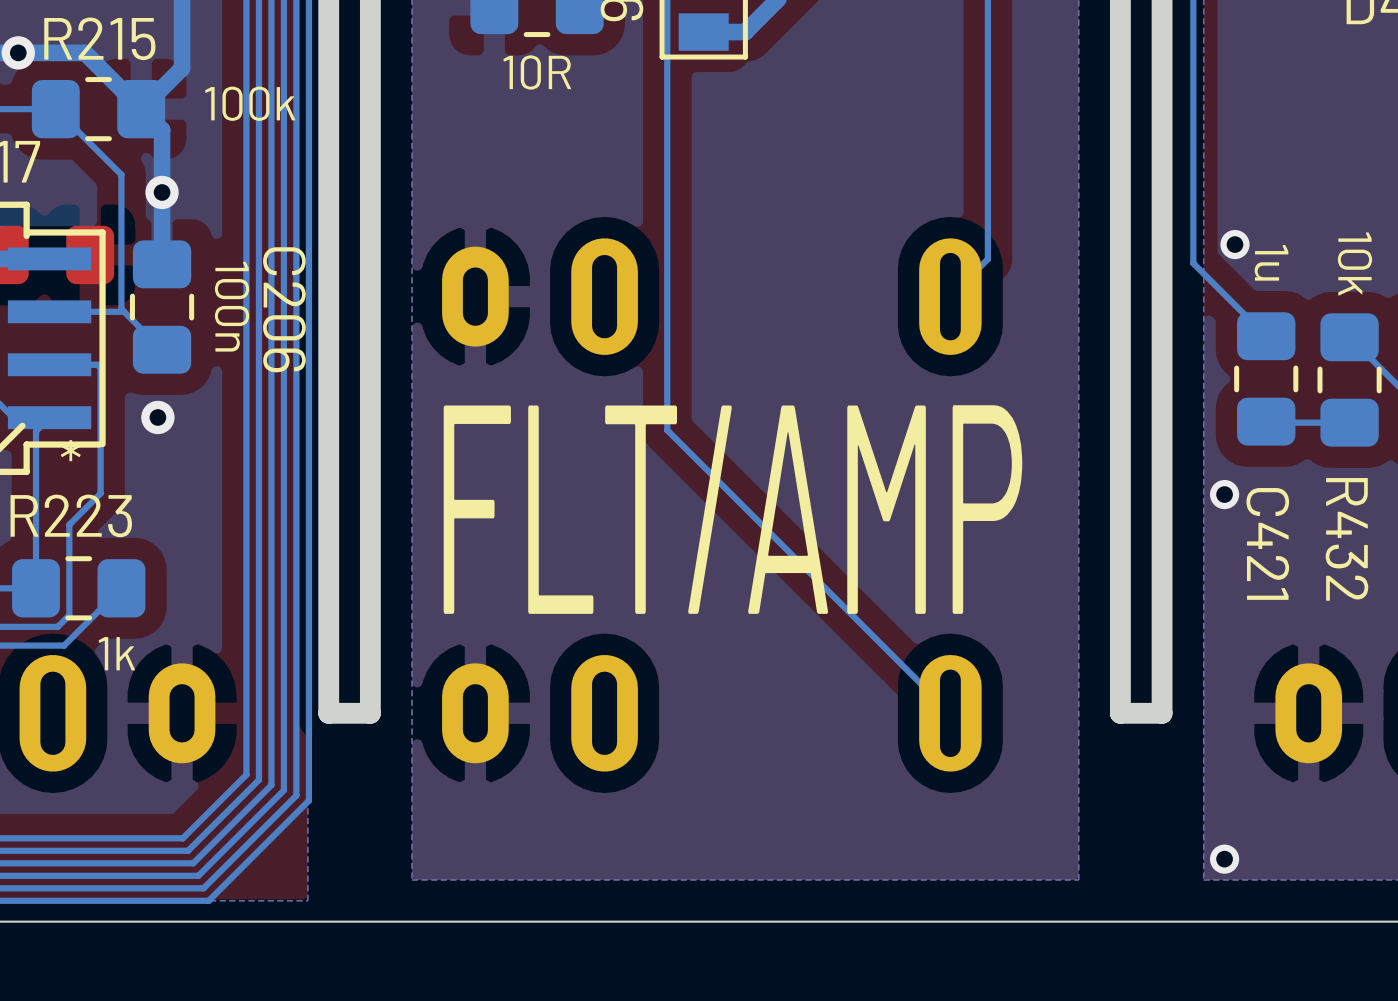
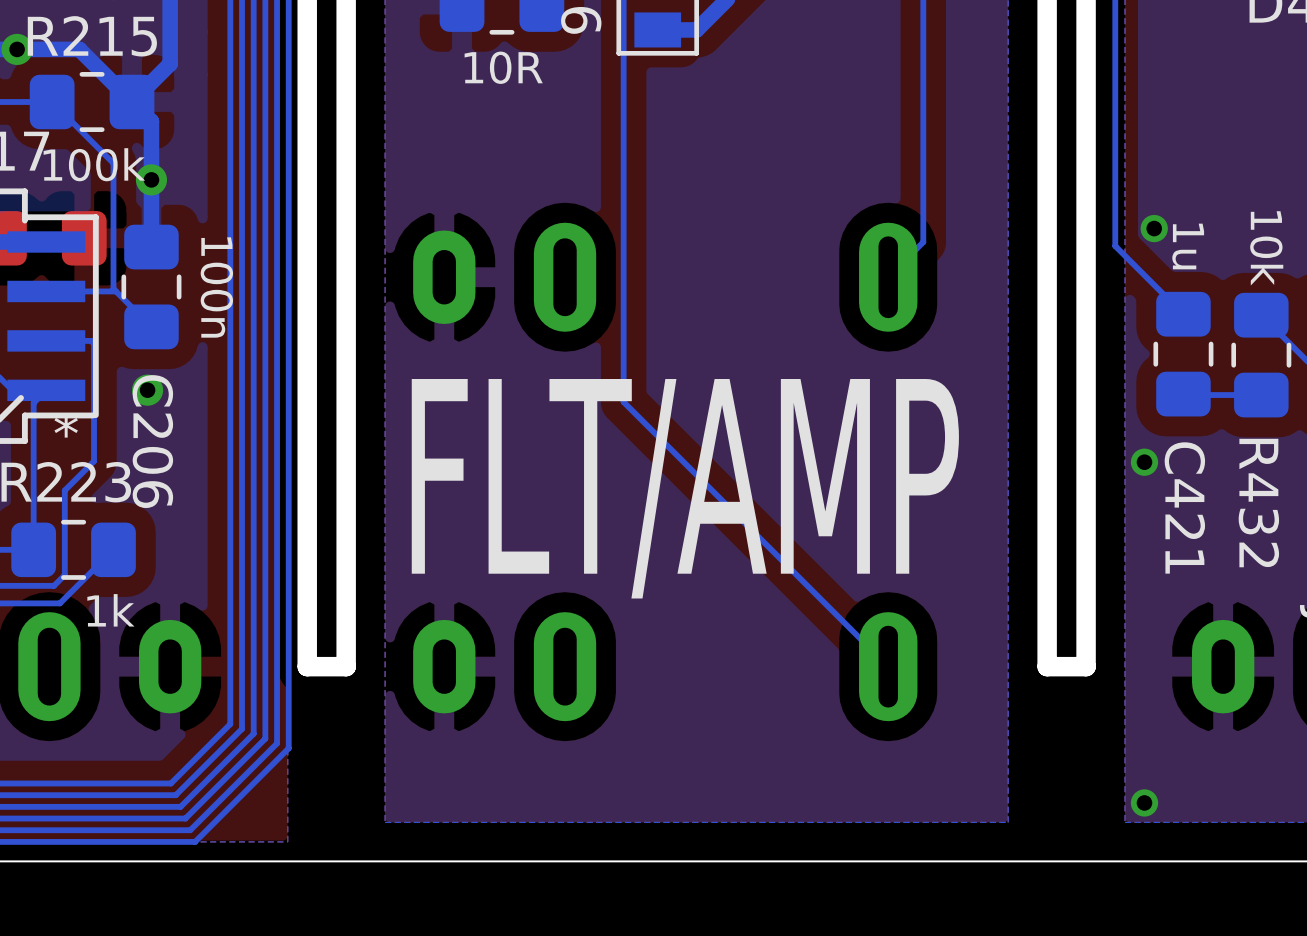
R215 value position: 100k (250, 103) -> 100k (94, 164)
C206 name position: C206 (284, 309) -> C206 (152, 441)

